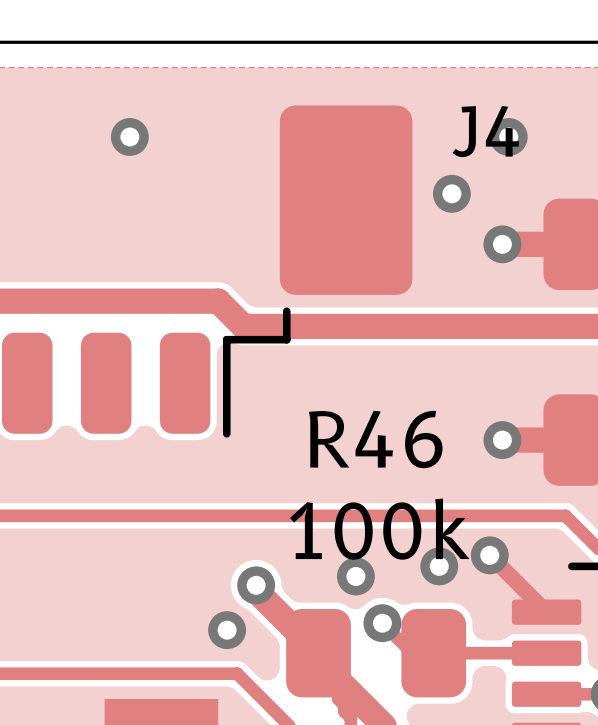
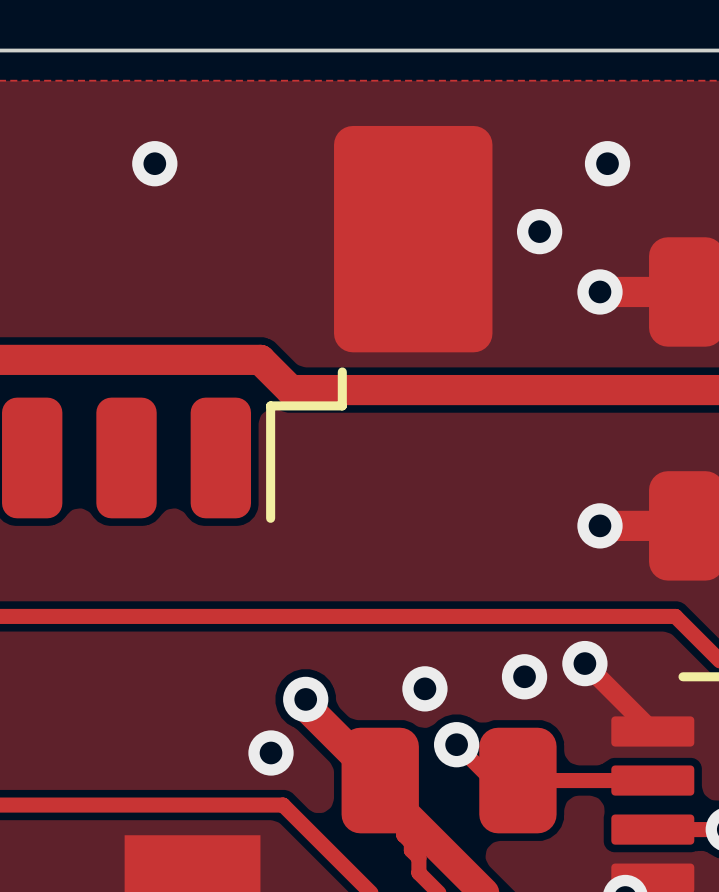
text: J4 (485, 131) -> none
text: R46 (375, 439) -> none
text: 100k (379, 529) -> none

